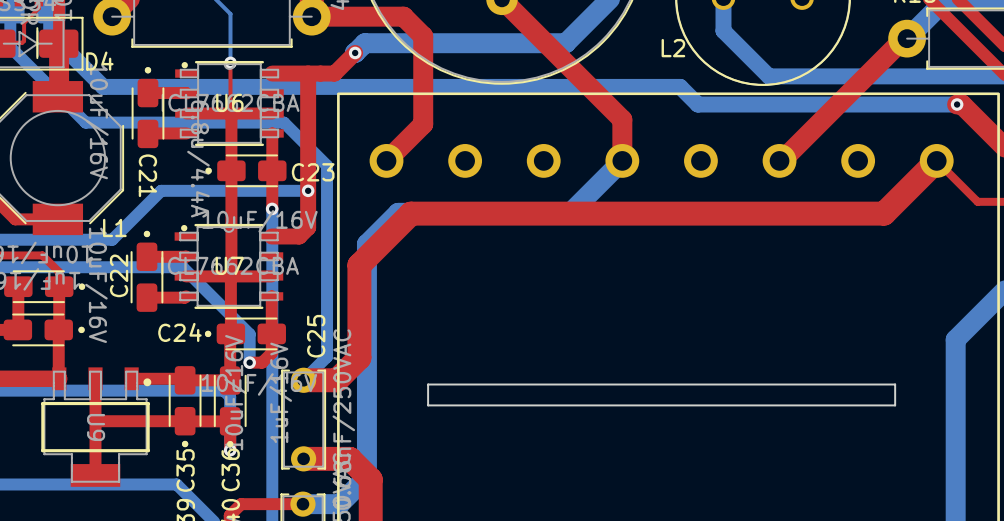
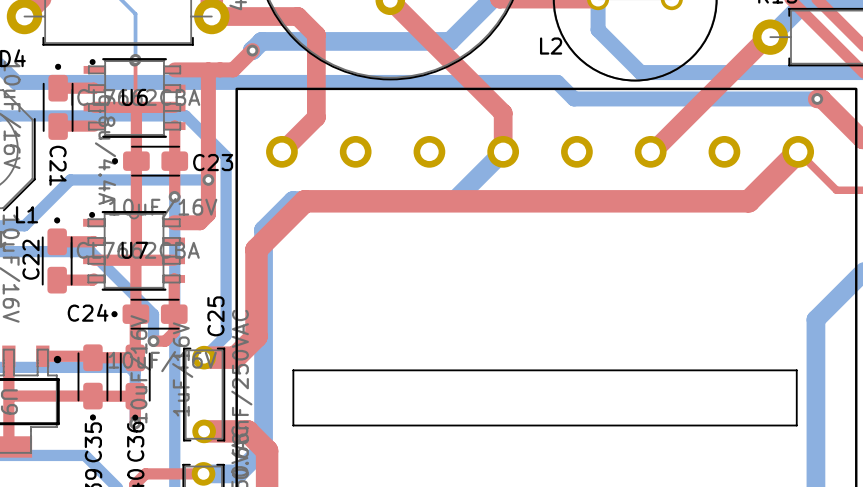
board edge: (428, 384) (895, 384) (895, 405) (428, 405) (428, 384) -> none
board edge: none -> (293, 370) (796, 370) (796, 425) (293, 425) (293, 370)

